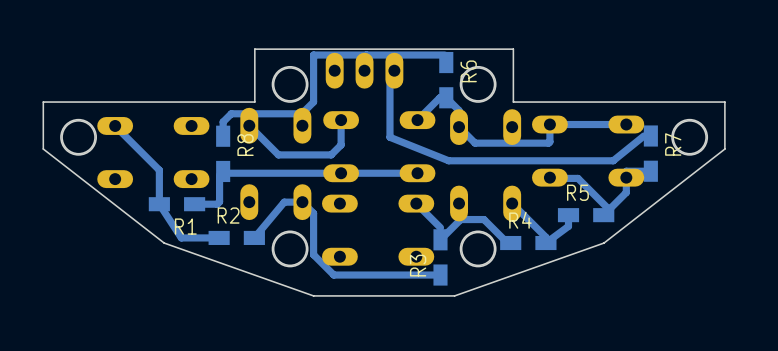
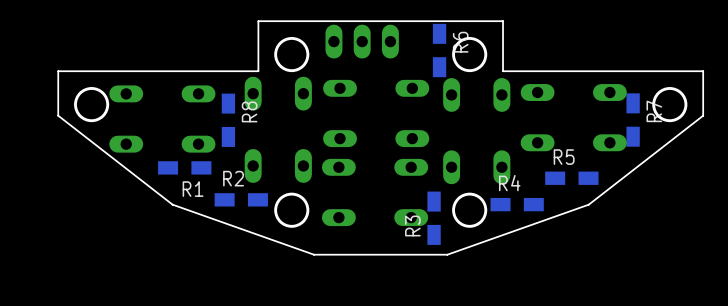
track: (446, 62) (444, 55) (313, 55) (313, 102) (301, 113) (231, 113) (223, 121) (223, 136) -> none
track: (394, 70) (389, 75) (389, 137) (448, 160) (613, 160) (643, 136) (650, 136) -> none
track: (341, 120) (341, 145) (331, 154) (278, 154) (249, 125) -> none
track: (417, 120) (439, 97) (446, 97) (459, 110) (459, 127) (475, 143) (548, 143) (549, 124) (626, 124) -> none
track: (115, 125) (159, 170) (159, 204) (181, 237) (219, 237) -> none
track: (650, 171) (626, 171) (626, 192) (603, 215) (609, 210) (578, 178) (549, 177) -> none
track: (417, 173) (224, 173) (223, 171) (219, 175) (219, 201) (217, 204) (194, 204) -> none
track: (416, 203) (440, 227) (440, 239) (460, 219) (483, 219) (510, 246) (510, 243) -> none
track: (512, 203) (545, 237) (545, 243) (568, 226) (568, 215) -> none
track: (254, 237) (284, 202) (302, 202) (313, 213) (313, 254) (333, 275) (440, 275) -> none

